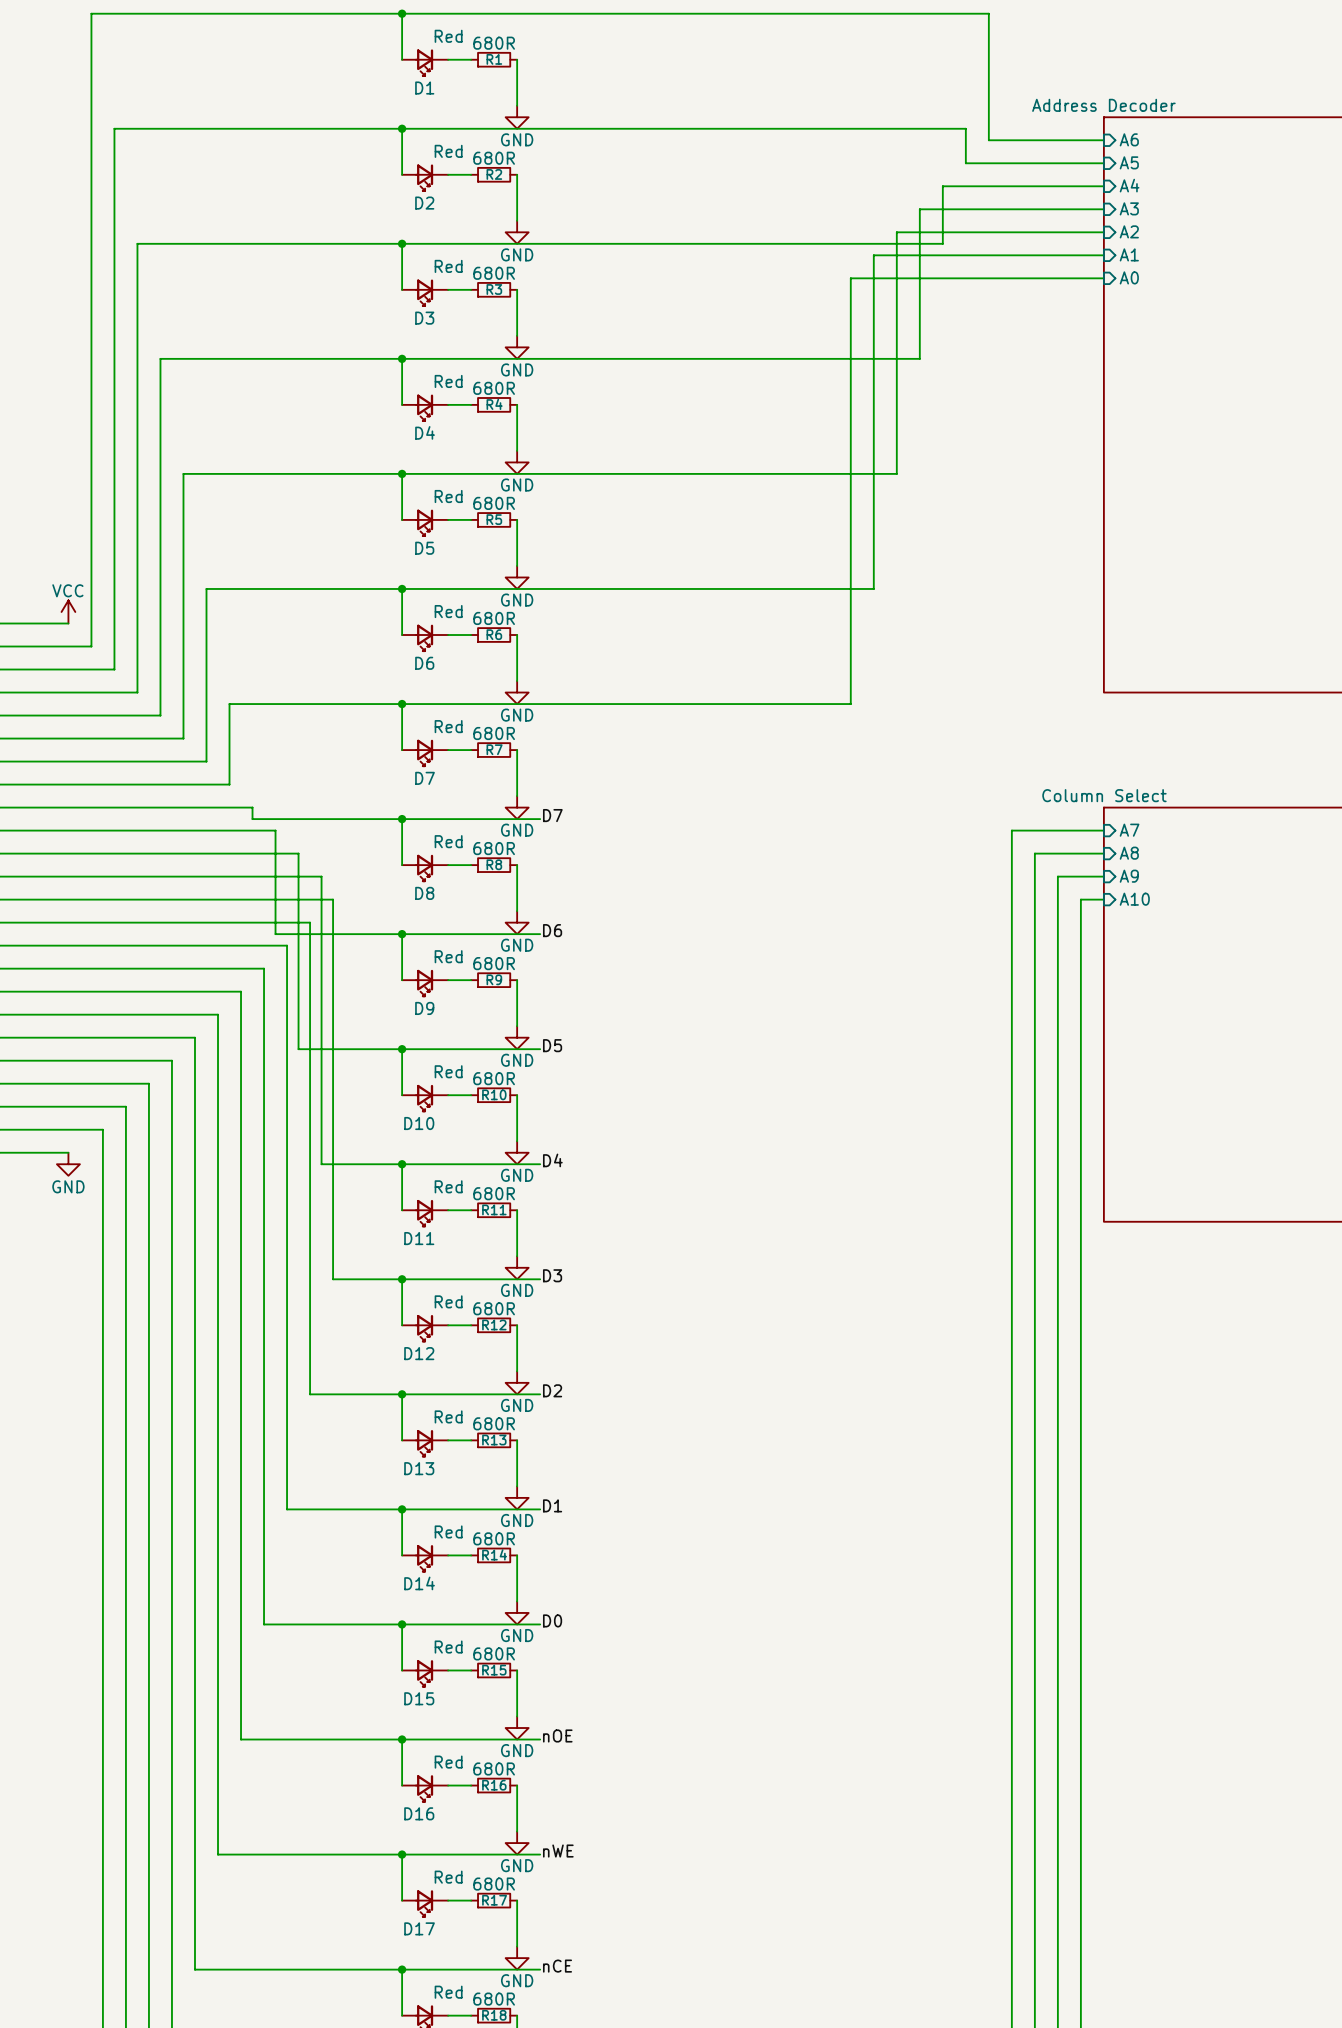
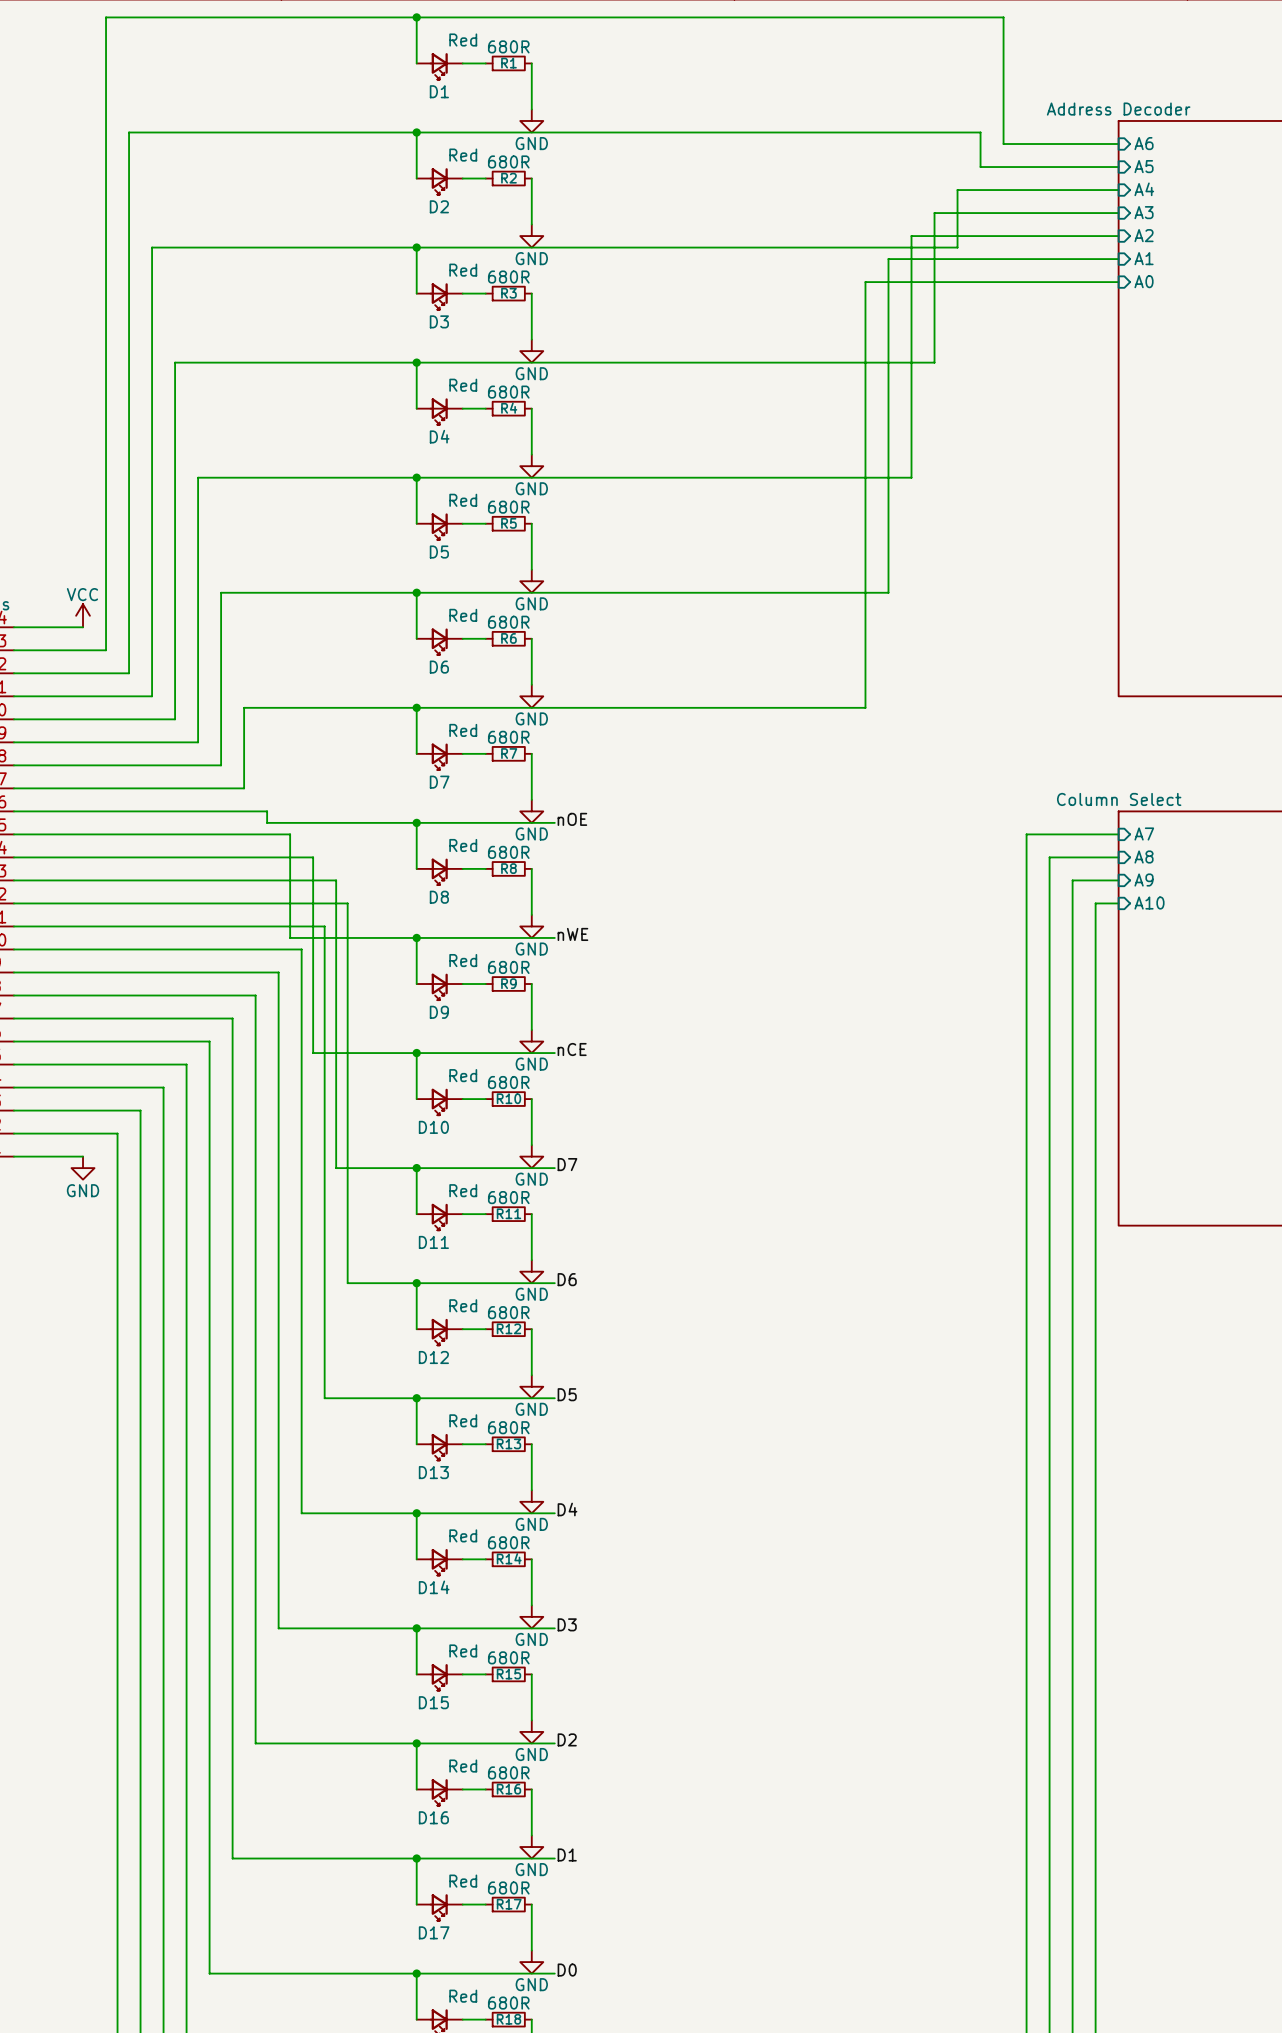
label: D7 (552, 815) -> nOE (572, 819)
label: D6 (552, 930) -> nWE (572, 934)
label: D5 (552, 1045) -> nCE (572, 1049)
label: D4 (552, 1160) -> D7 (567, 1164)
label: D3 (552, 1275) -> D6 (567, 1279)
label: D2 (552, 1390) -> D5 (567, 1394)
label: D1 (552, 1505) -> D4 (567, 1509)
label: D0 (552, 1620) -> D3 (567, 1624)
label: nOE (557, 1735) -> D2 (567, 1739)
label: nWE (558, 1851) -> D1 (567, 1854)
label: nCE (557, 1966) -> D0 (567, 1970)

